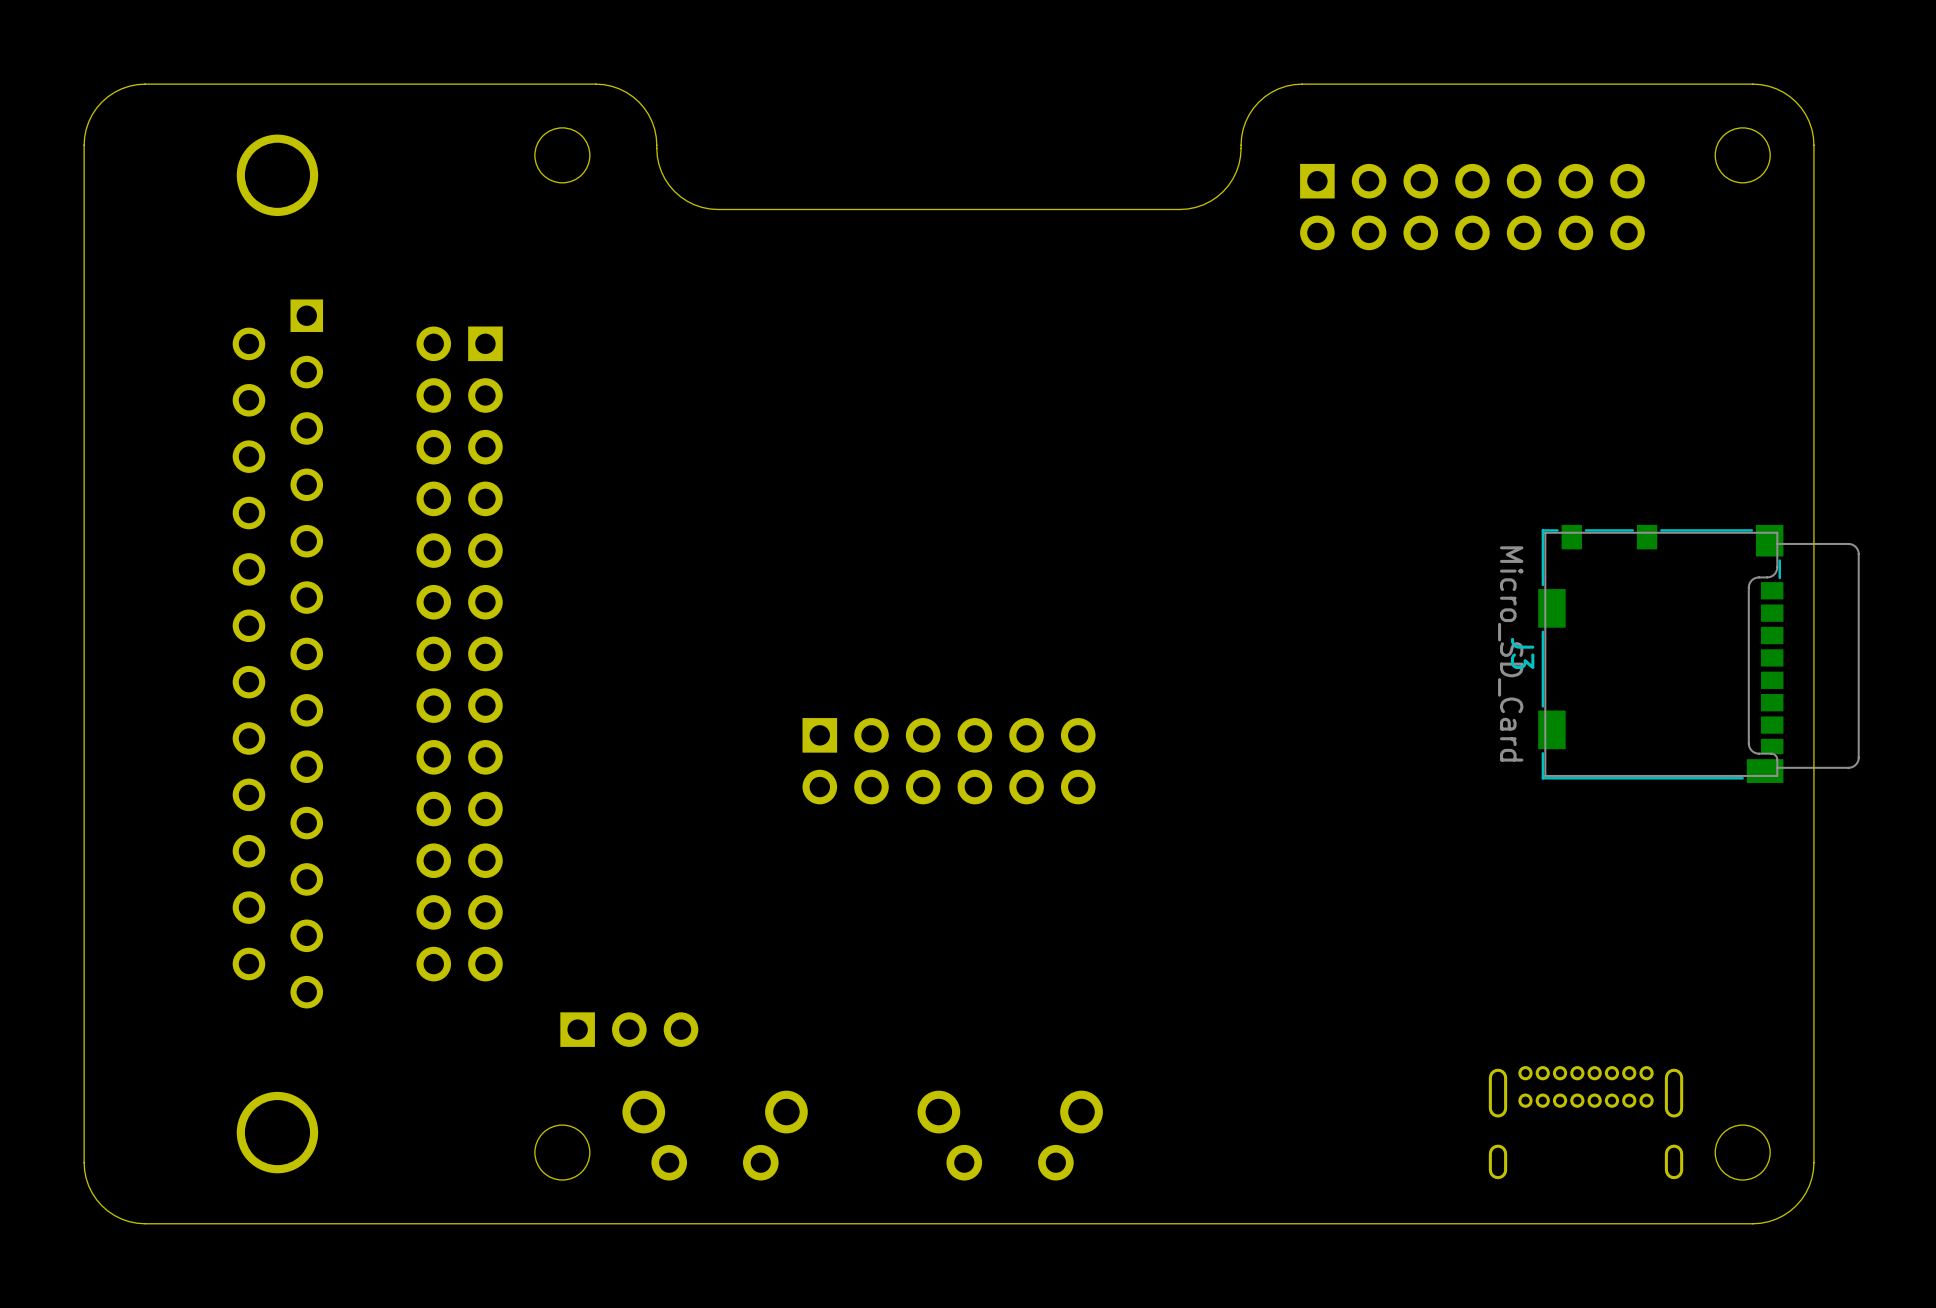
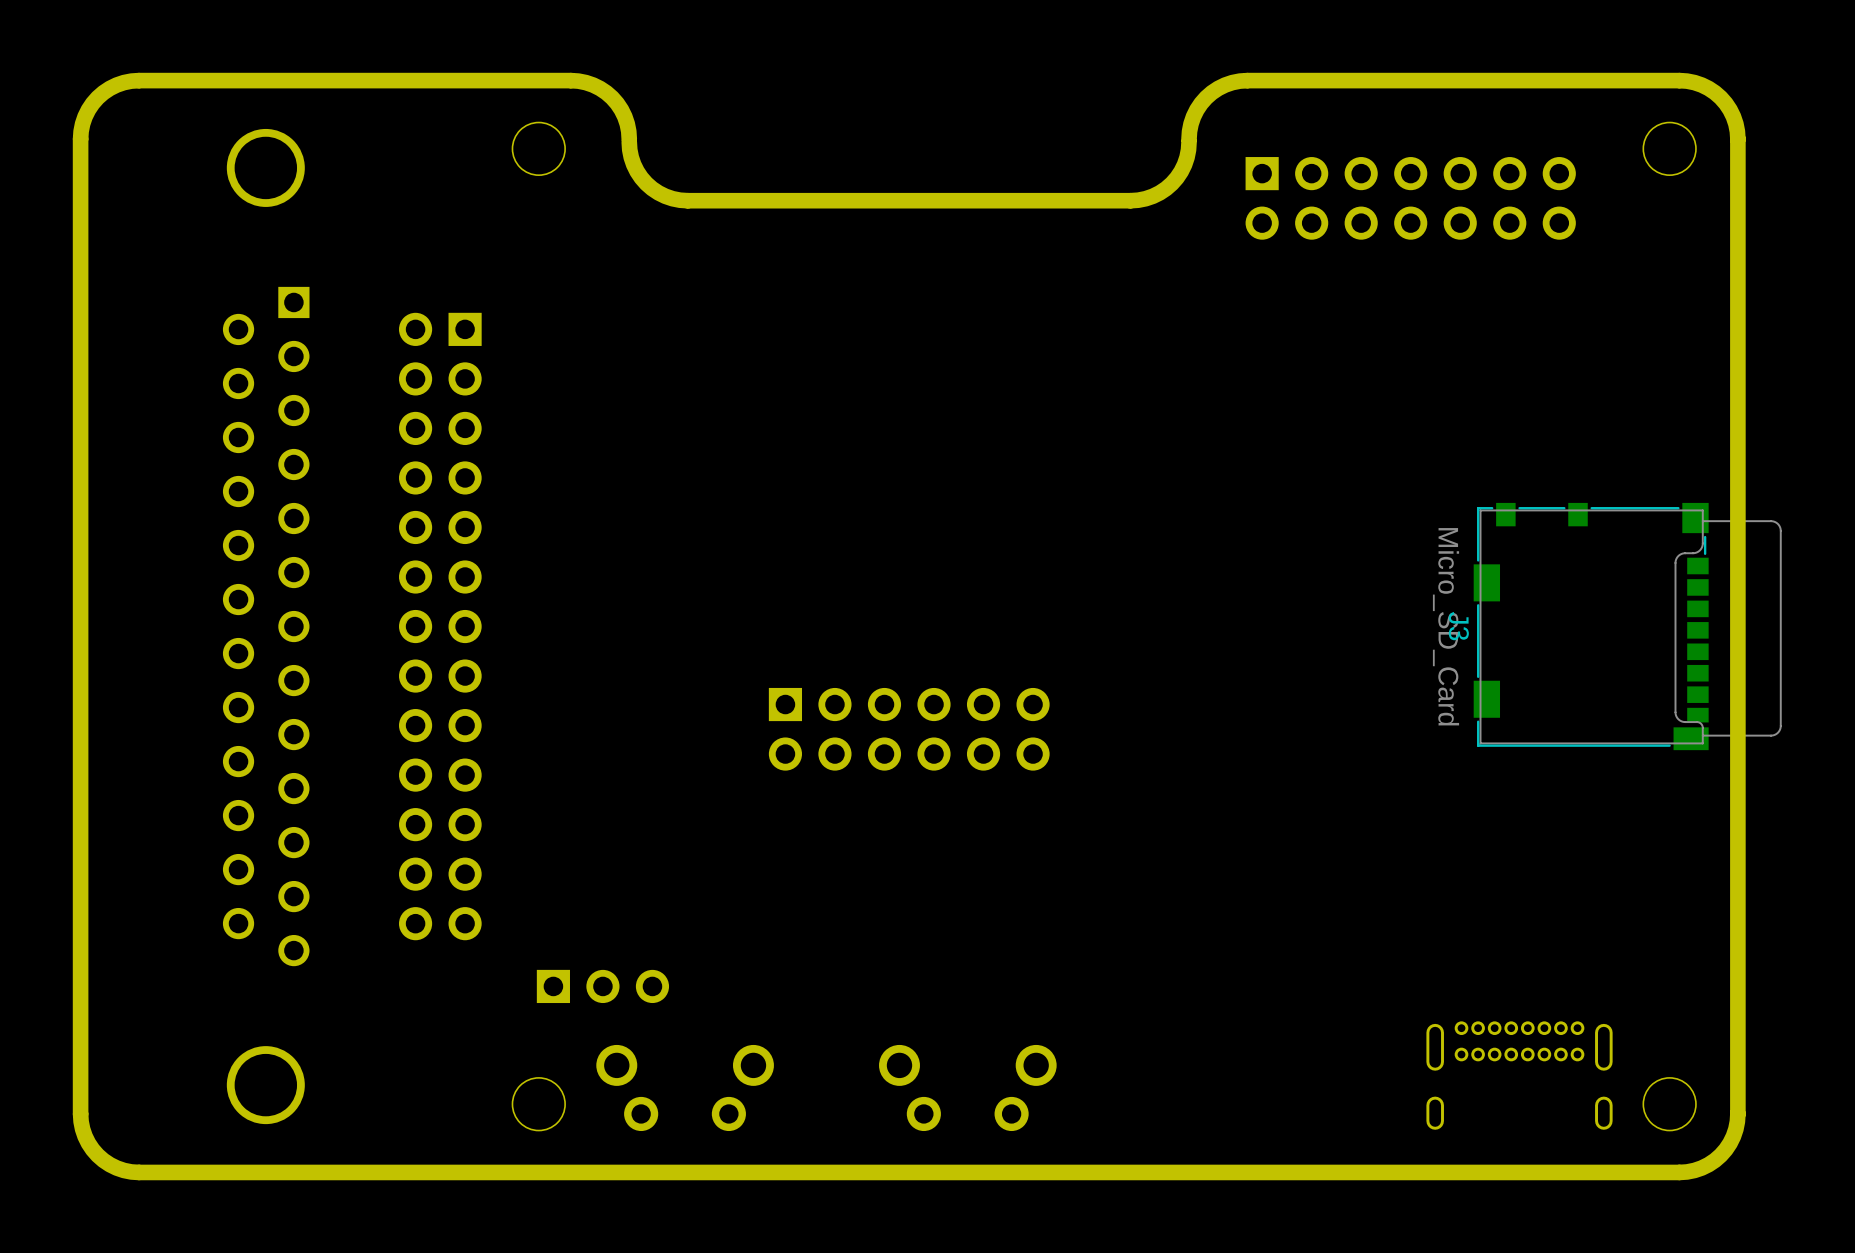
board edge width: thin (1241, 145) (1245, 121) (1258, 102) (1278, 88) (1302, 84) (1752, 84) (1768, 86) (1783, 92) (1796, 102) (1805, 114) (1811, 129) (1813, 145) (1813, 1162) (1811, 1178) (1805, 1193) (1796, 1205) (1783, 1215) (1768, 1221) (1752, 1223) (145, 1223) (121, 1219) (102, 1205) (88, 1186) (84, 1162) (84, 145) (86, 129) (92, 114) (102, 102) (114, 92) (129, 86) (145, 84) (595, 84) (619, 88) (638, 102) (652, 121) (656, 145) -> thick (1189, 139) (1193, 116) (1206, 97) (1225, 85) (1247, 80) (1679, 80) (1694, 82) (1708, 88) (1720, 97) (1730, 109) (1735, 123) (1737, 139) (1737, 1113) (1735, 1129) (1730, 1143) (1720, 1155) (1708, 1164) (1694, 1170) (1679, 1172) (139, 1172) (116, 1168) (97, 1155) (85, 1136) (80, 1113) (80, 139) (82, 123) (88, 109) (97, 97) (109, 88) (123, 82) (139, 80) (570, 80) (593, 85) (612, 97) (624, 116) (629, 139)
board edge width: thin (1241, 148) (1236, 171) (1223, 191) (1203, 204) (1180, 209) (709, 208) (687, 201) (669, 185) (658, 164) (656, 148) -> thick (1189, 142) (1184, 164) (1171, 183) (1152, 196) (1130, 200) (680, 200) (658, 192) (641, 177) (631, 157) (629, 142)

